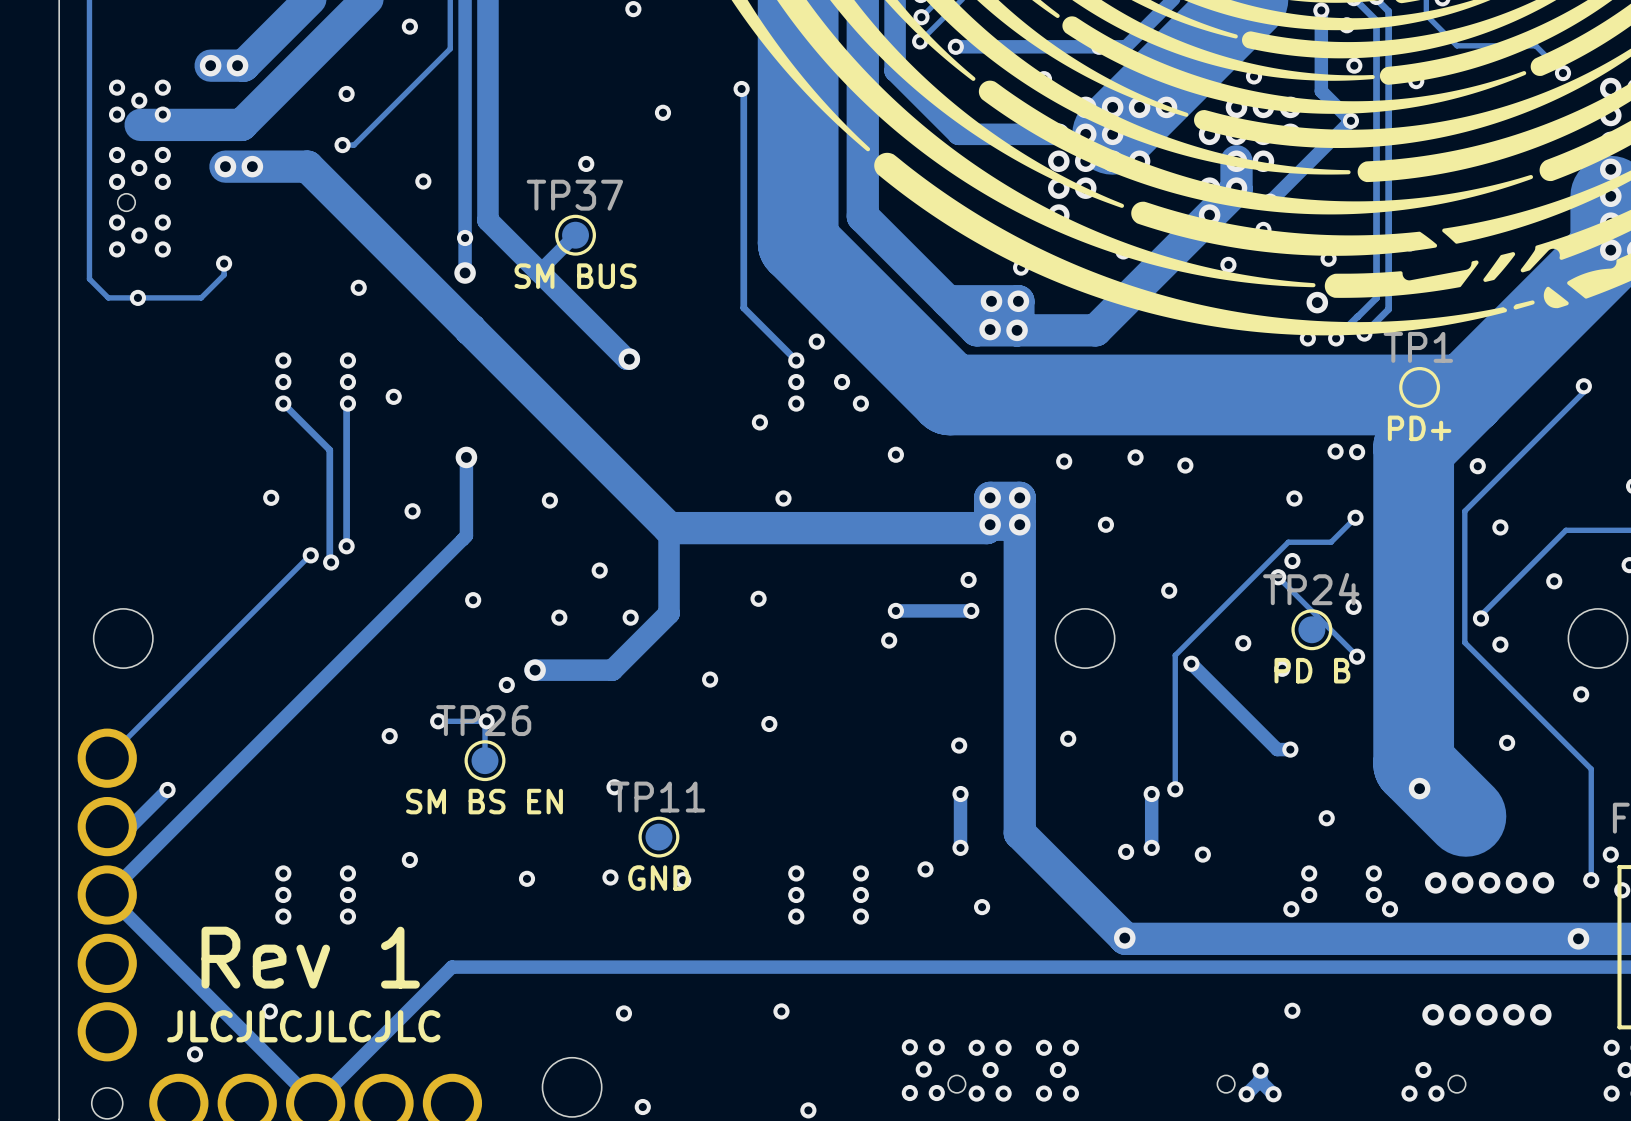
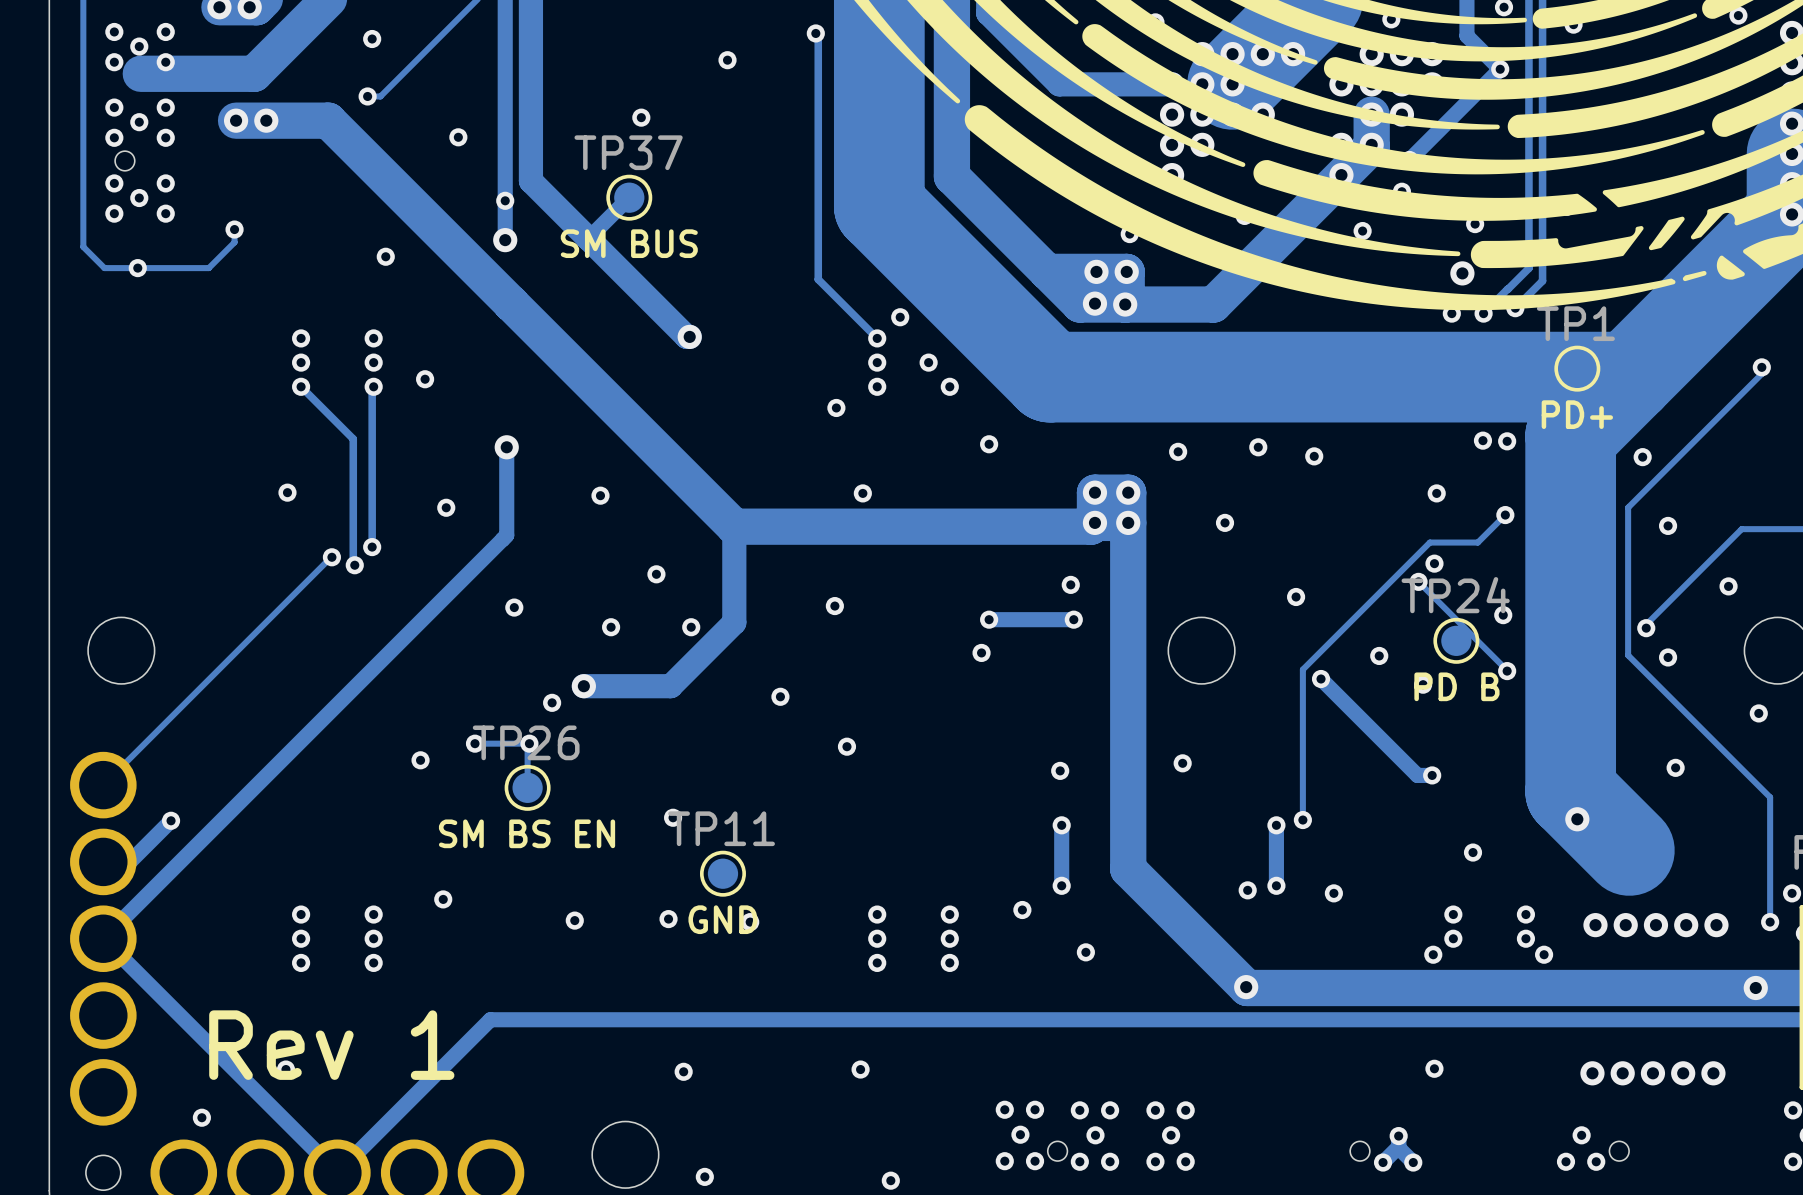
text position: Rev 1 (310, 957) -> Rev 1 (331, 1045)
text: JLCJLCJLCJLC (303, 1026) -> none

